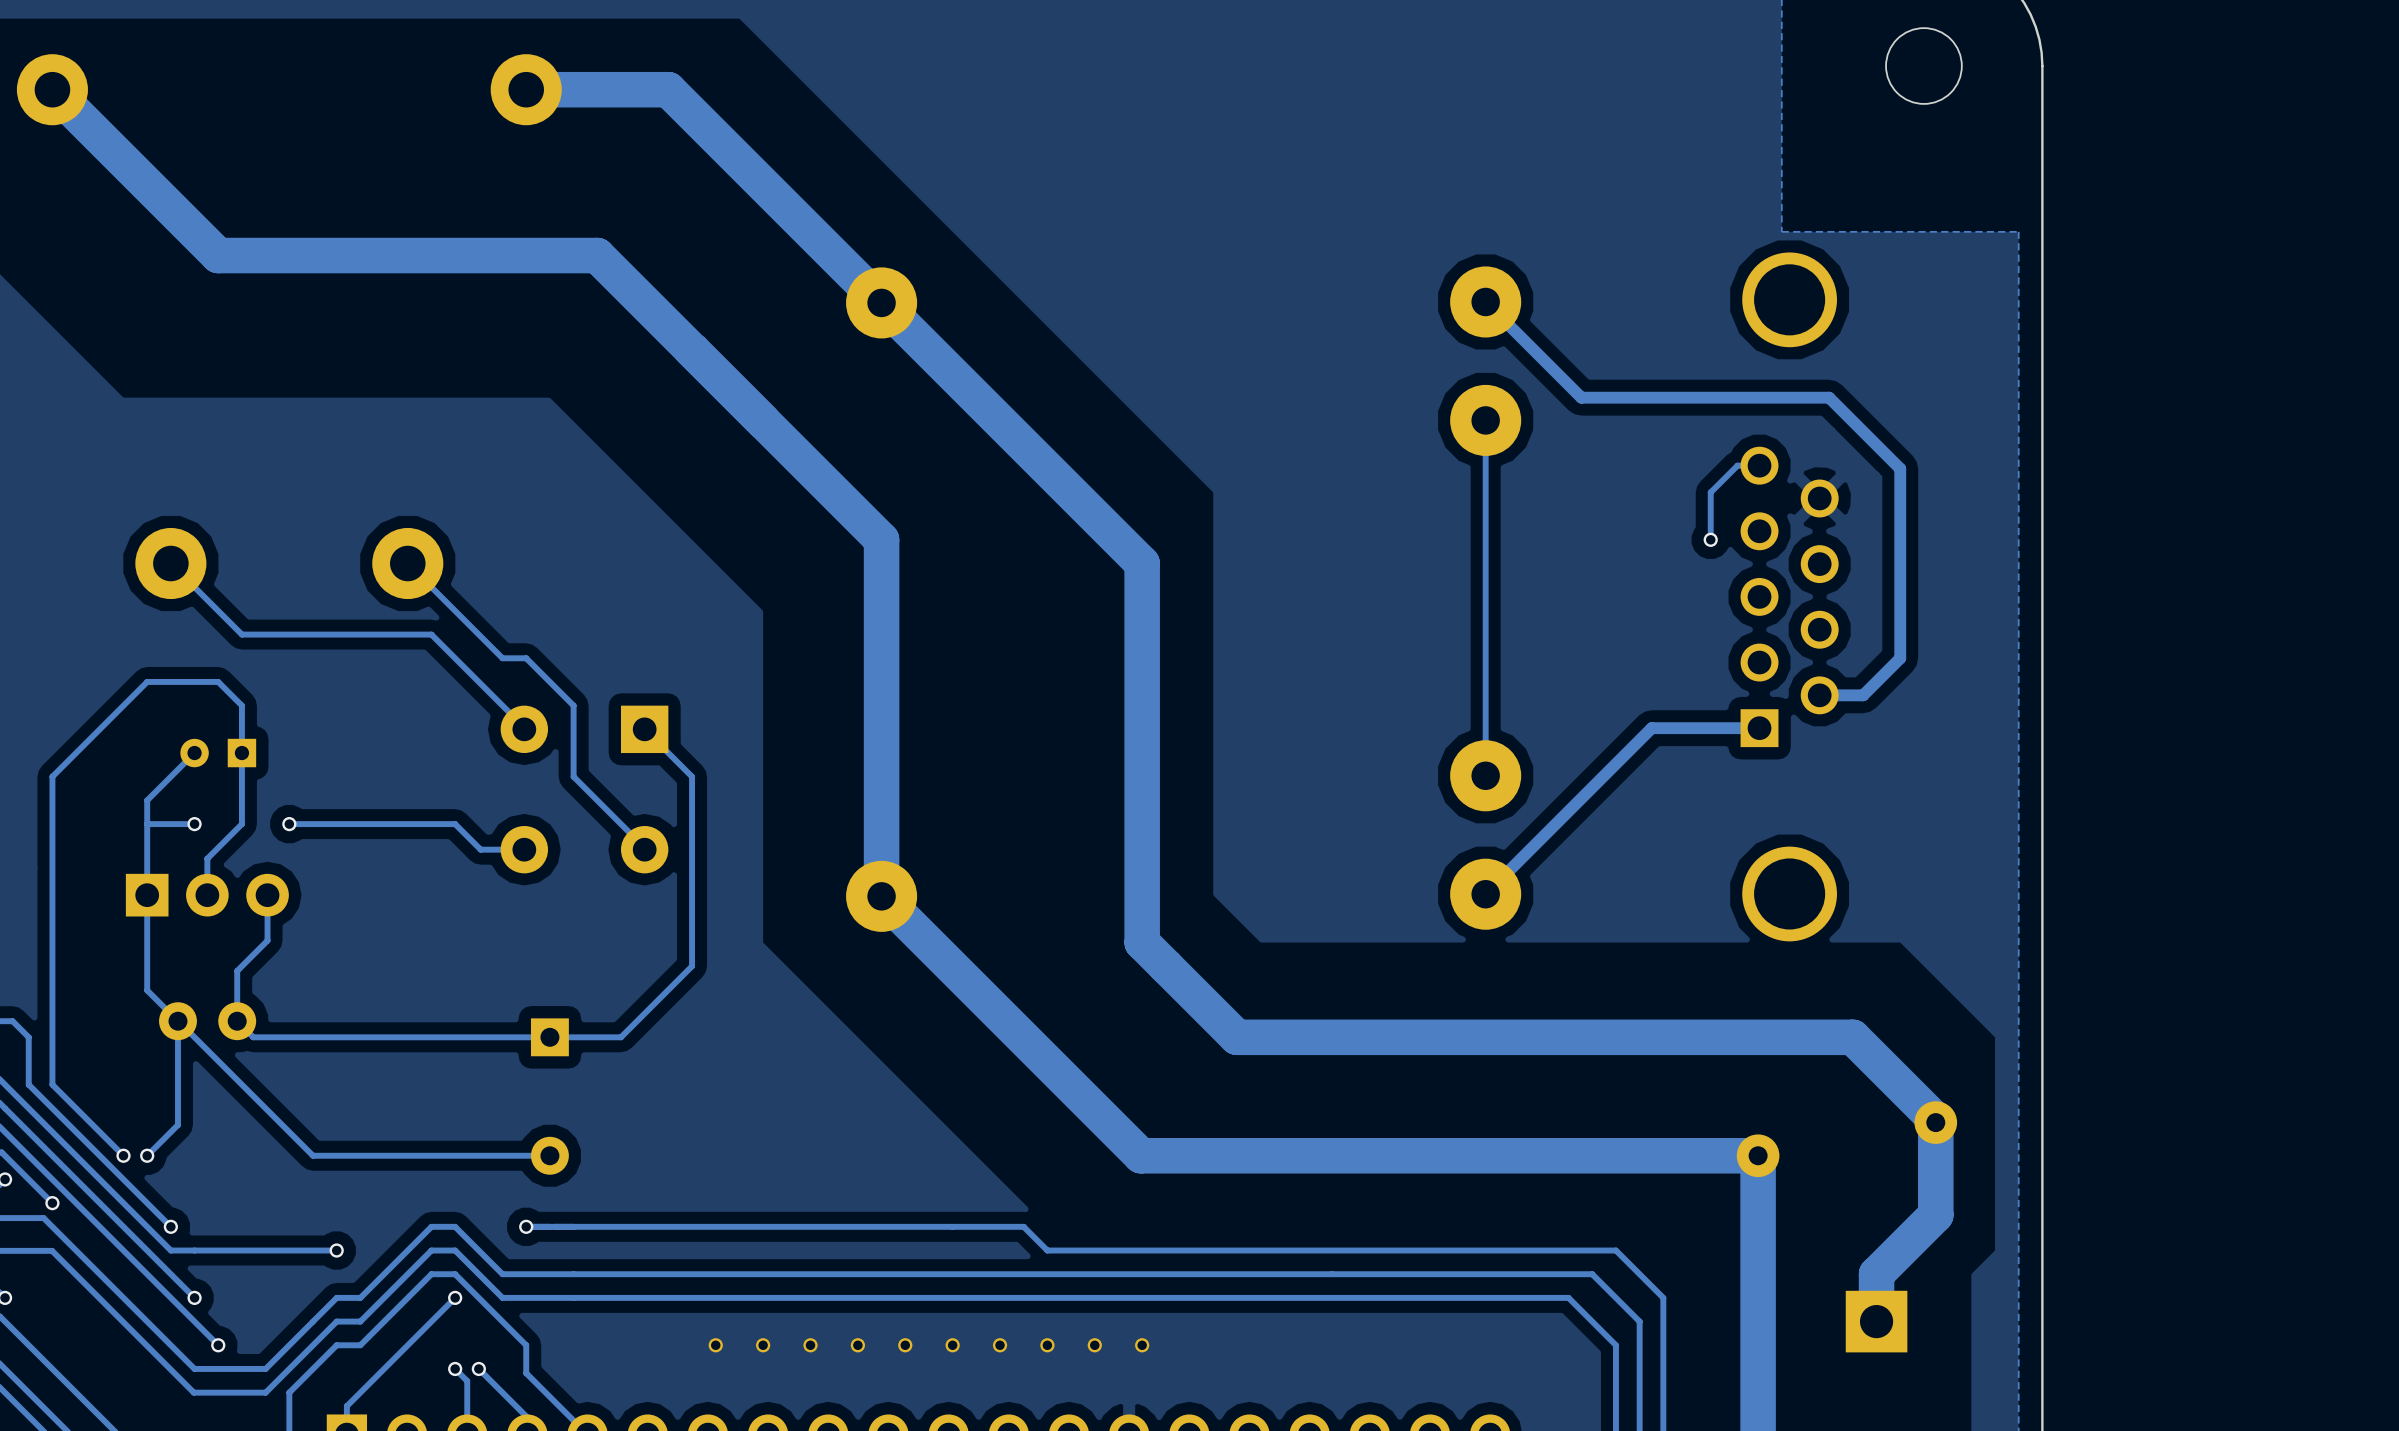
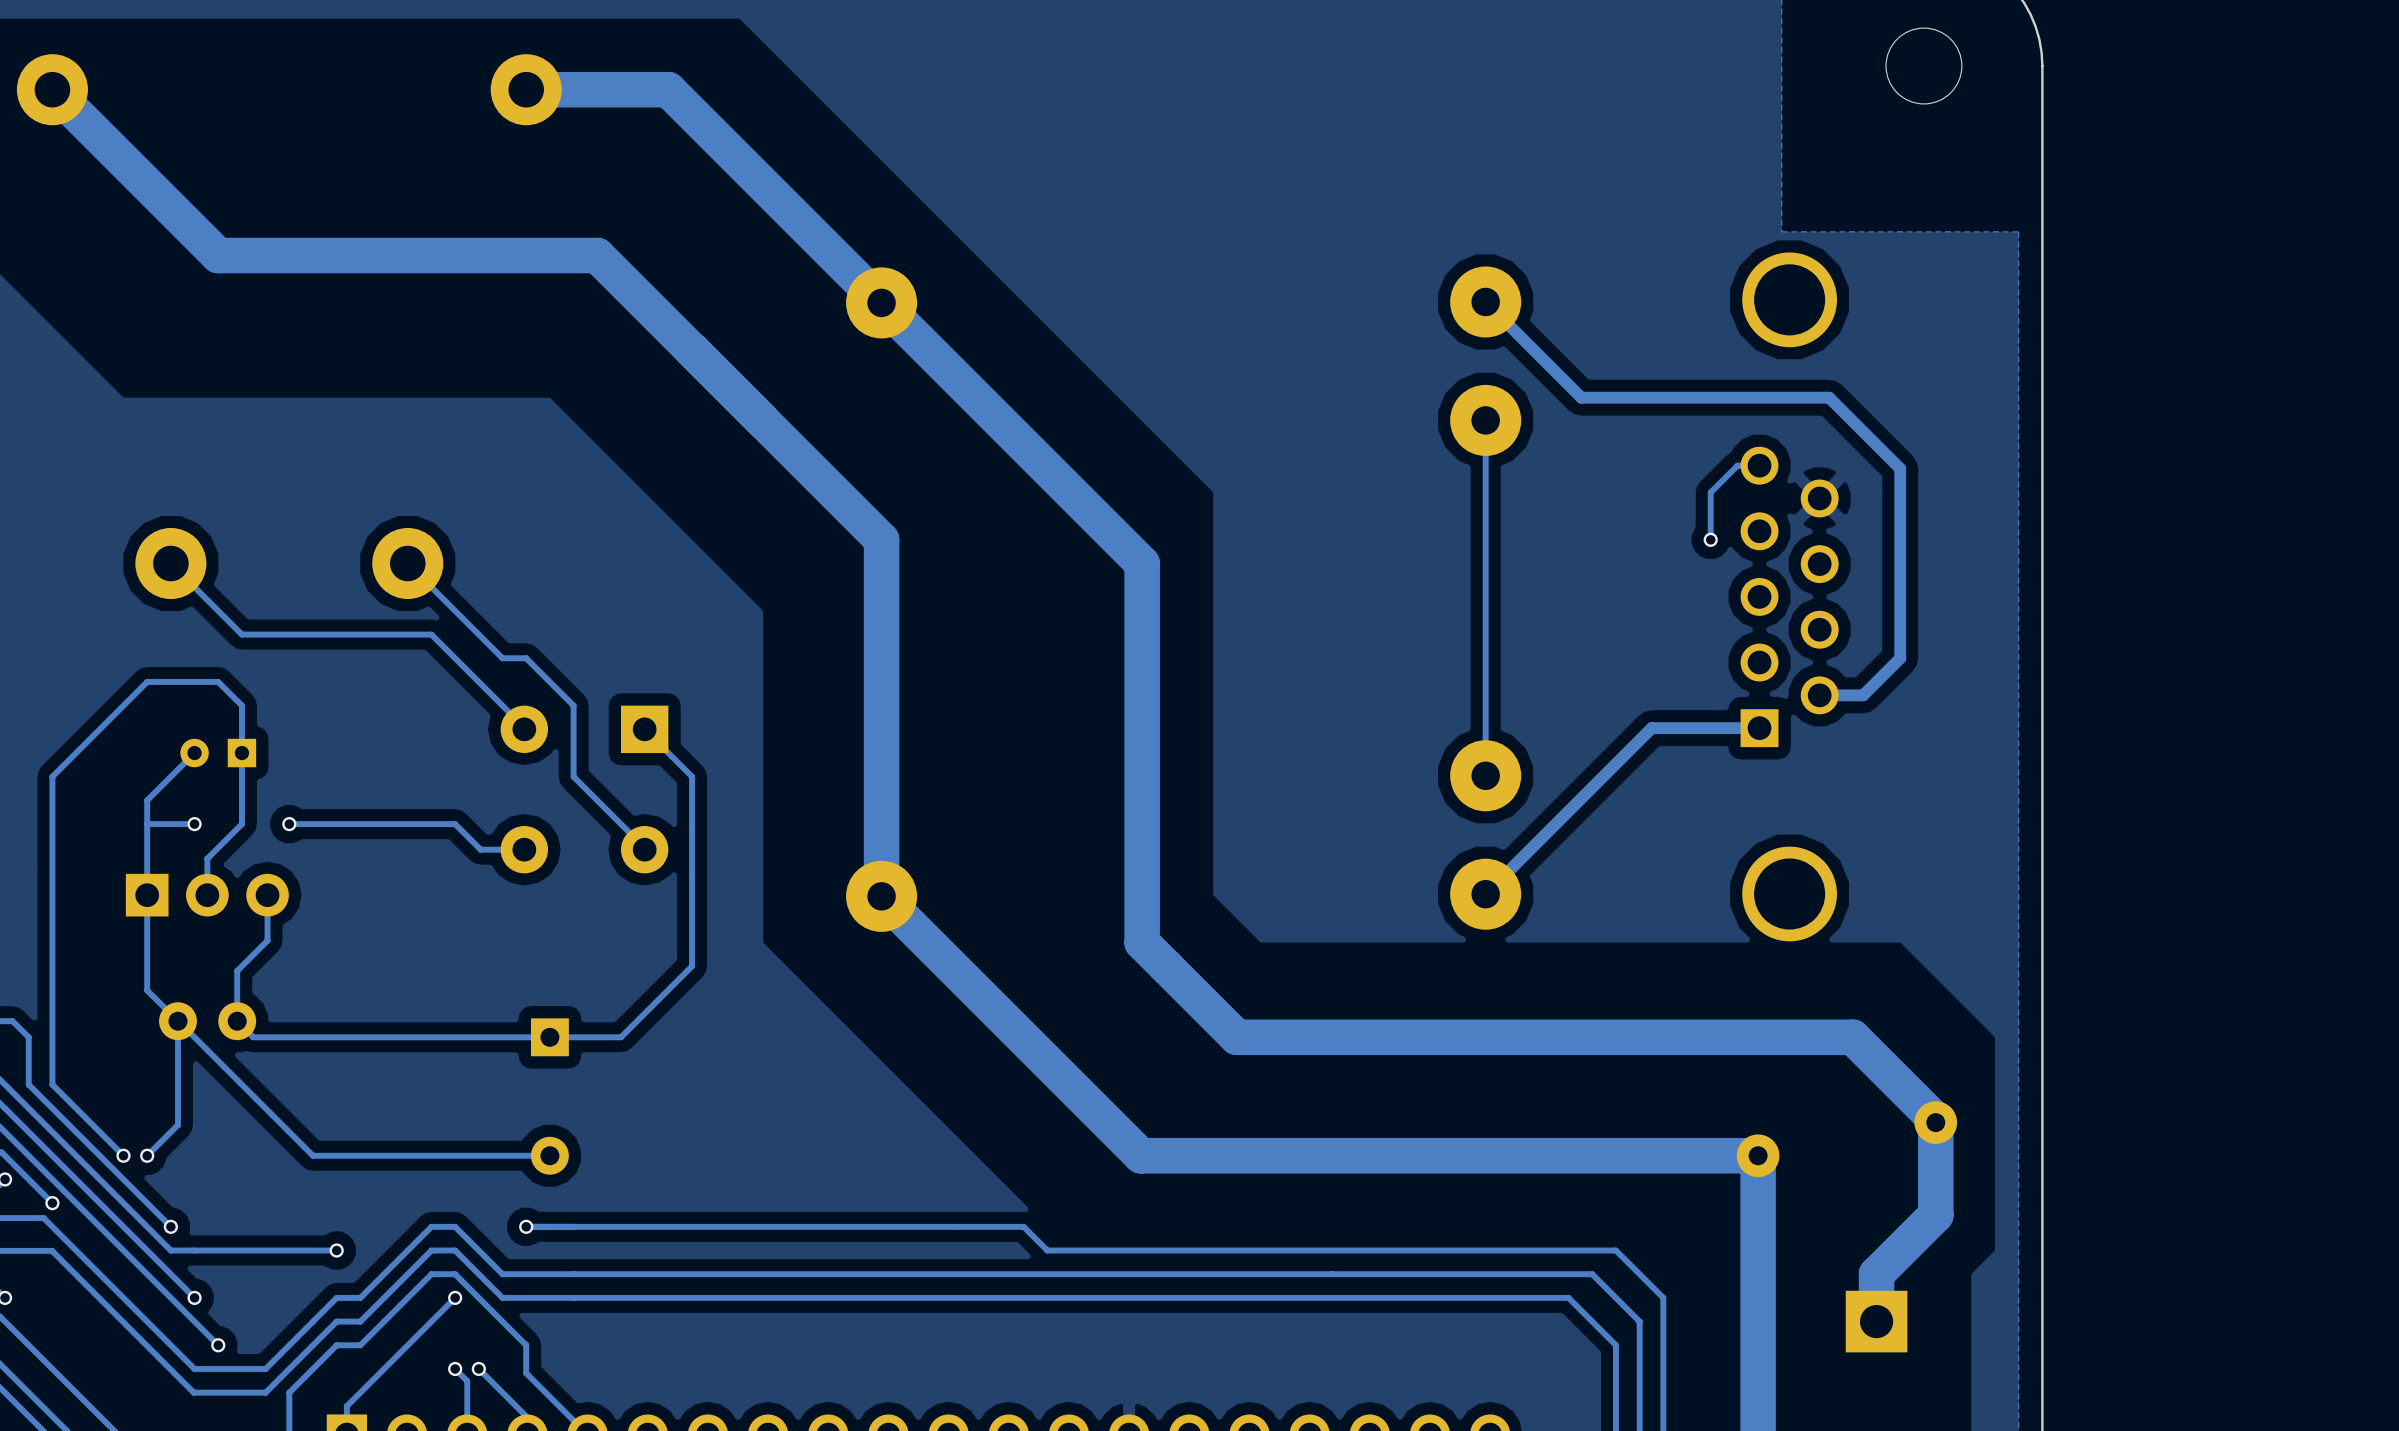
part: (715, 1345) -> none
part: (763, 1345) -> none
part: (810, 1345) -> none
part: (857, 1345) -> none
part: (905, 1345) -> none
part: (952, 1345) -> none
part: (1000, 1345) -> none
part: (1047, 1345) -> none
part: (1094, 1345) -> none
part: (1142, 1345) -> none

